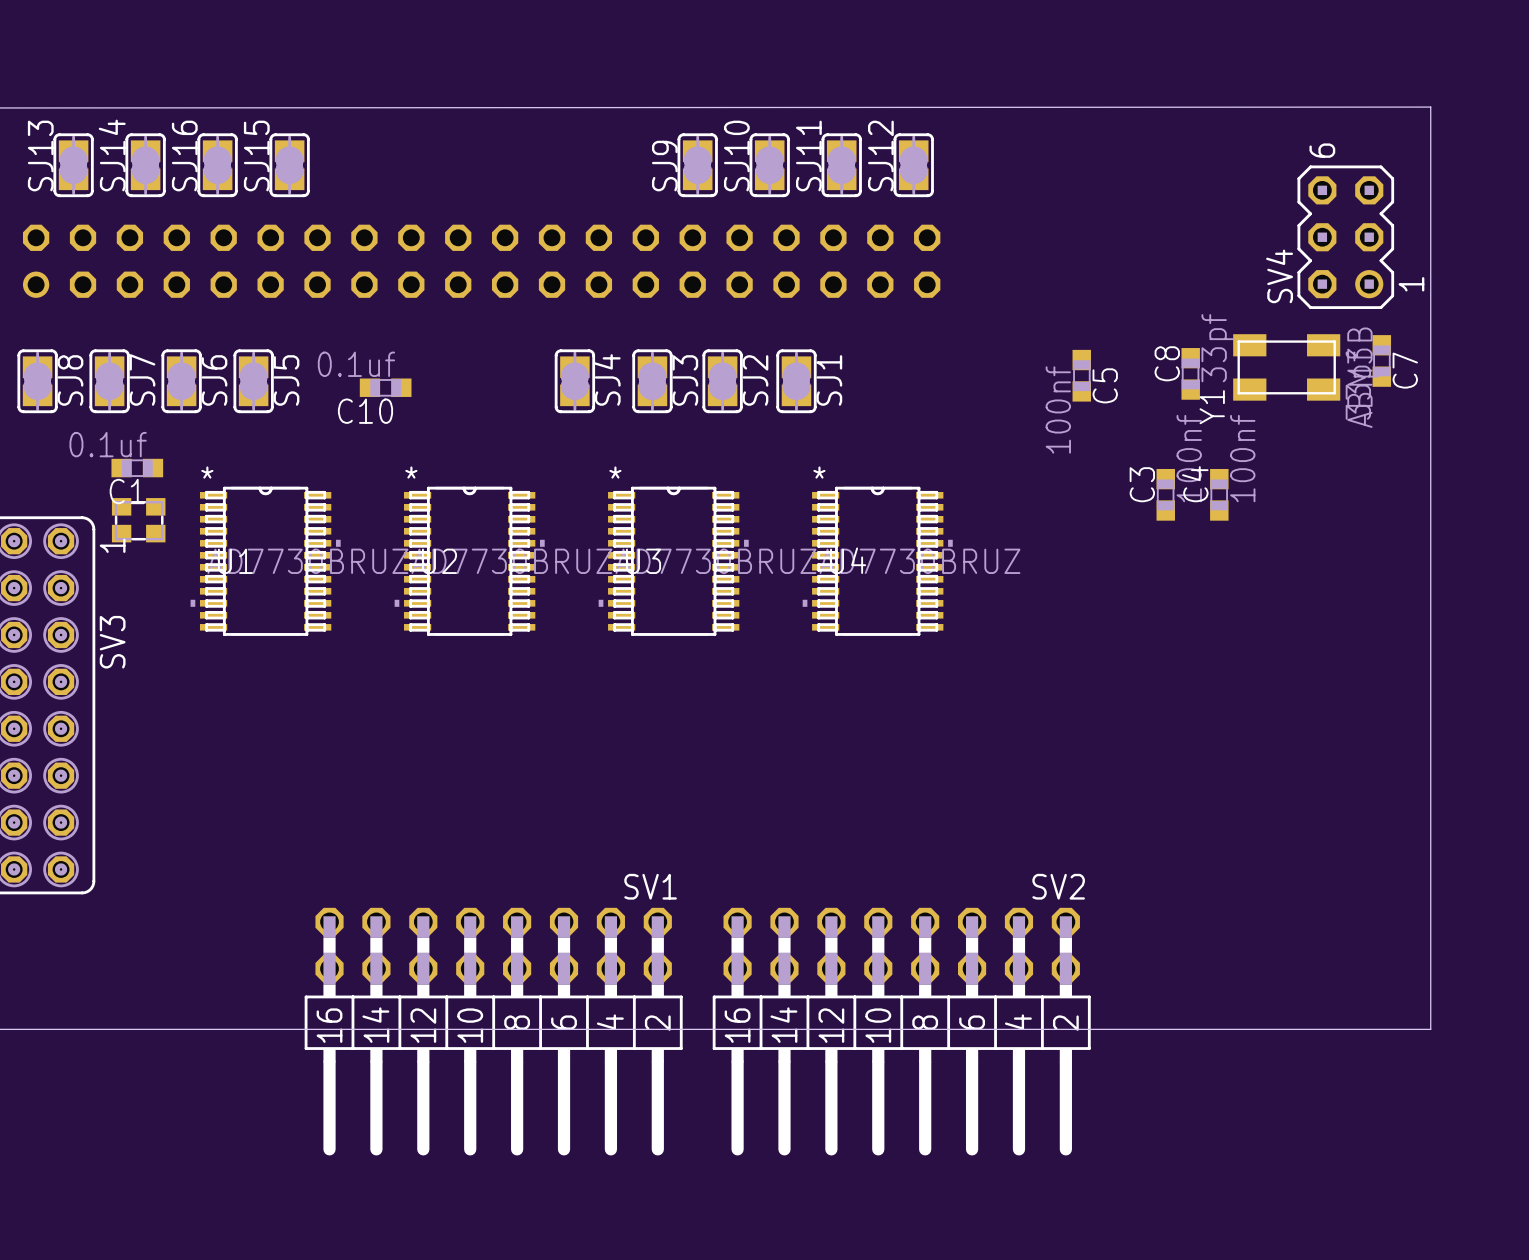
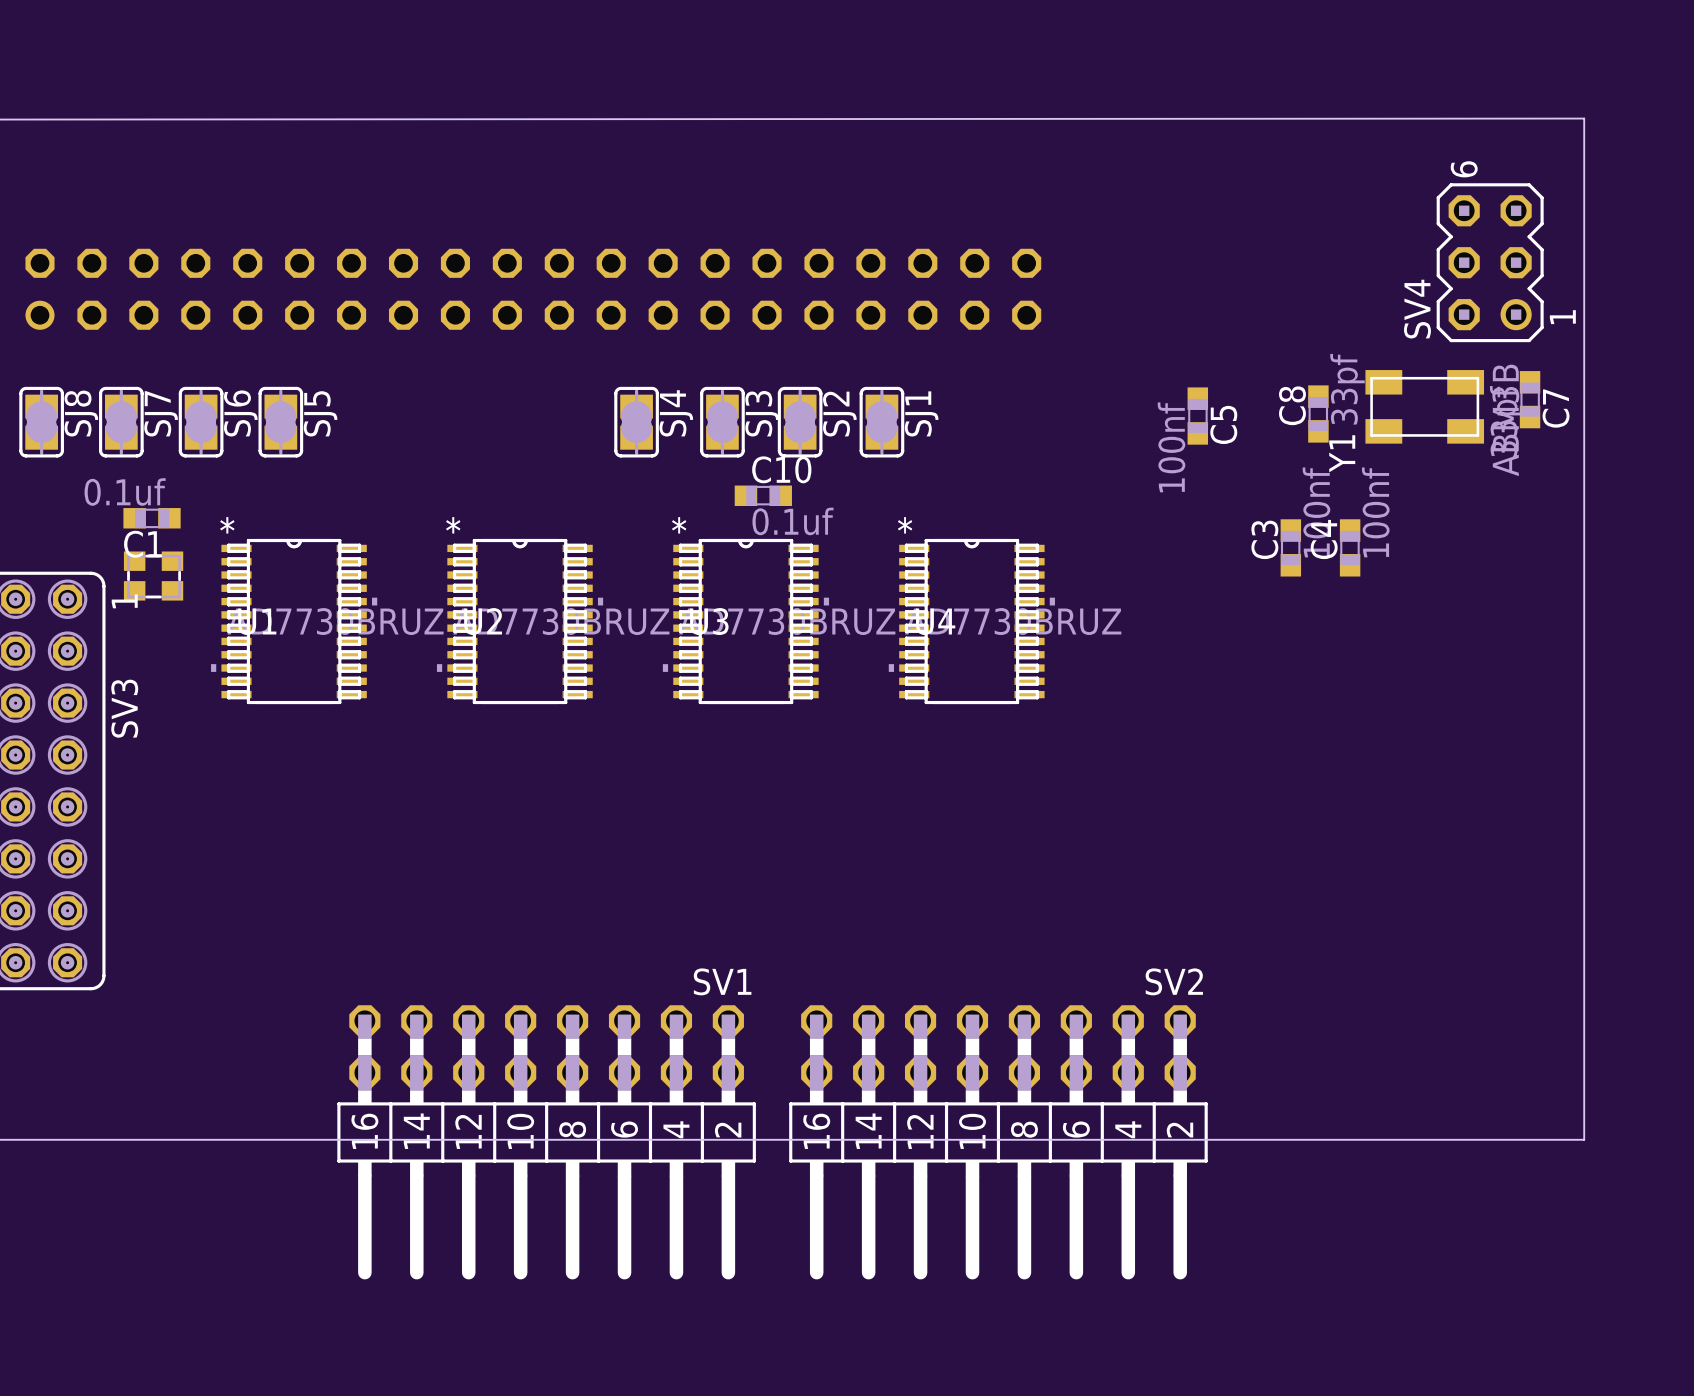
SJ13: (73, 165) -> none
SJ14: (145, 165) -> none
SJ16: (217, 165) -> none
SJ15: (289, 165) -> none
SJ9: (697, 165) -> none
SJ10: (769, 165) -> none
SJ11: (841, 165) -> none
SJ12: (913, 165) -> none
C10 value position: 0.1uf (356, 364) -> 0.1uf (793, 521)
C10 position: (385, 387) -> (763, 495)
C10 name position: C10 (365, 411) -> C10 (781, 469)

